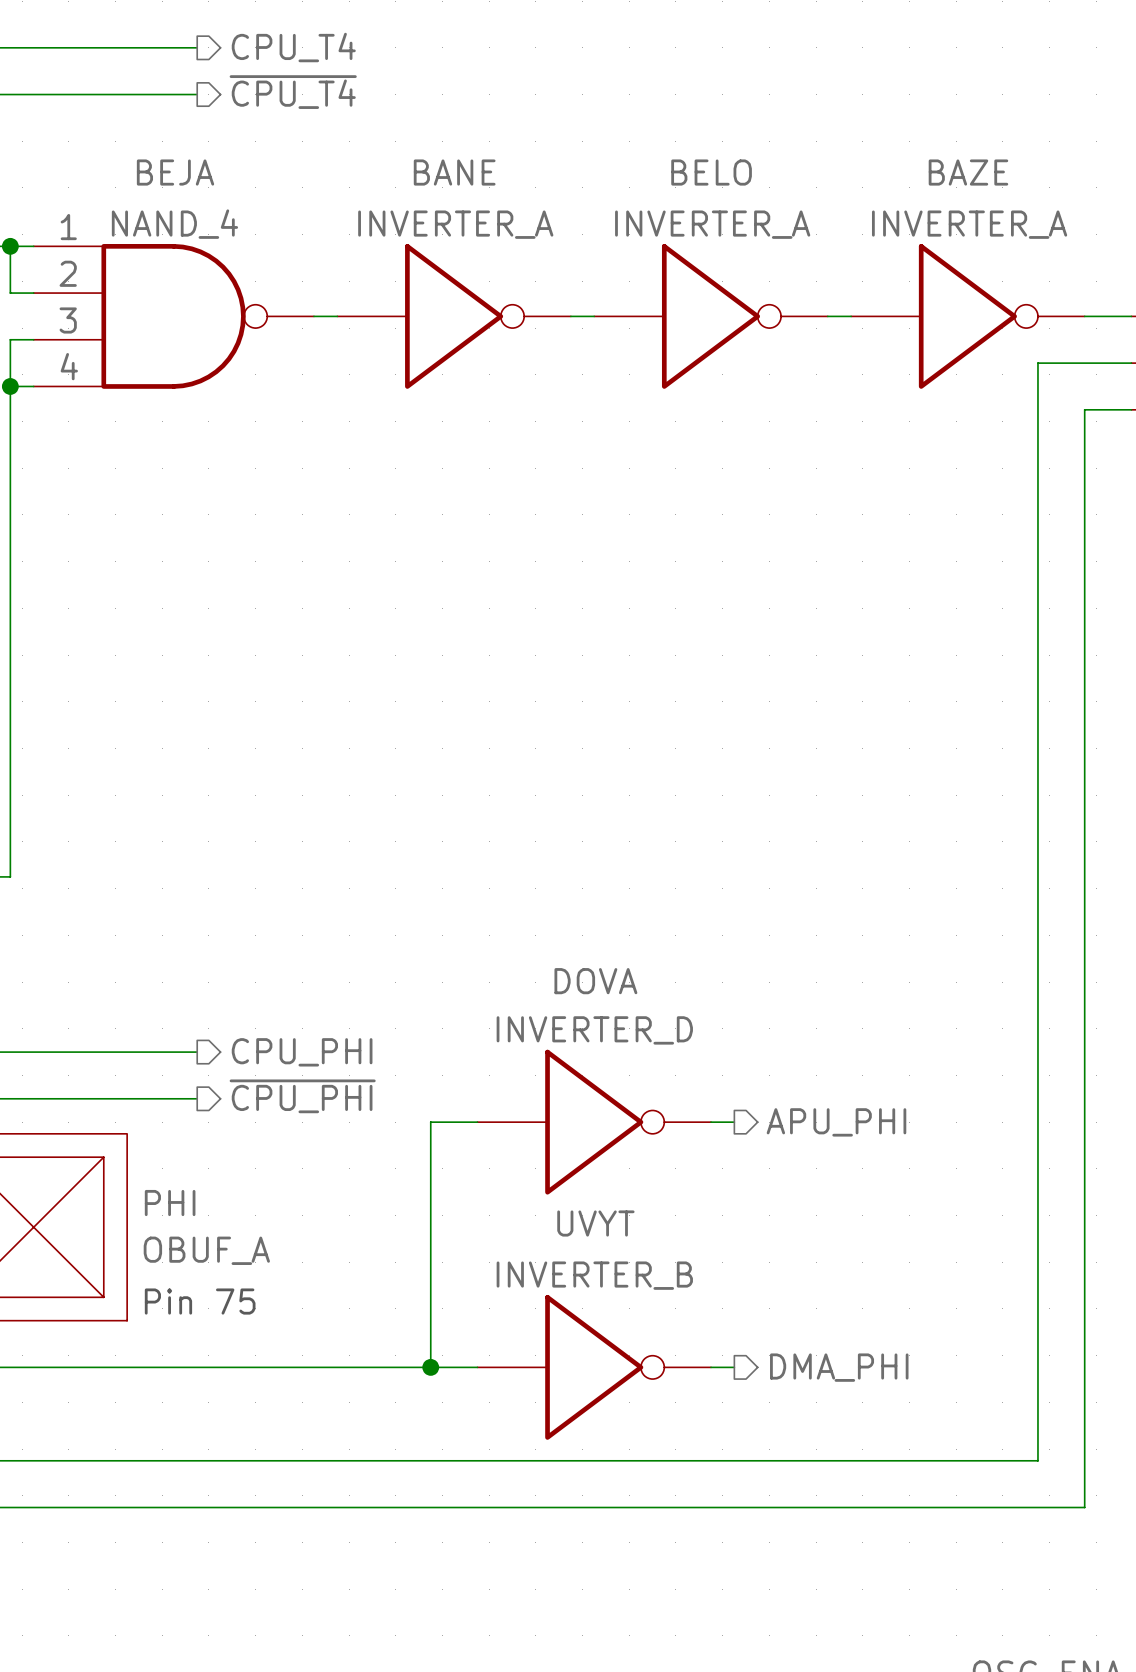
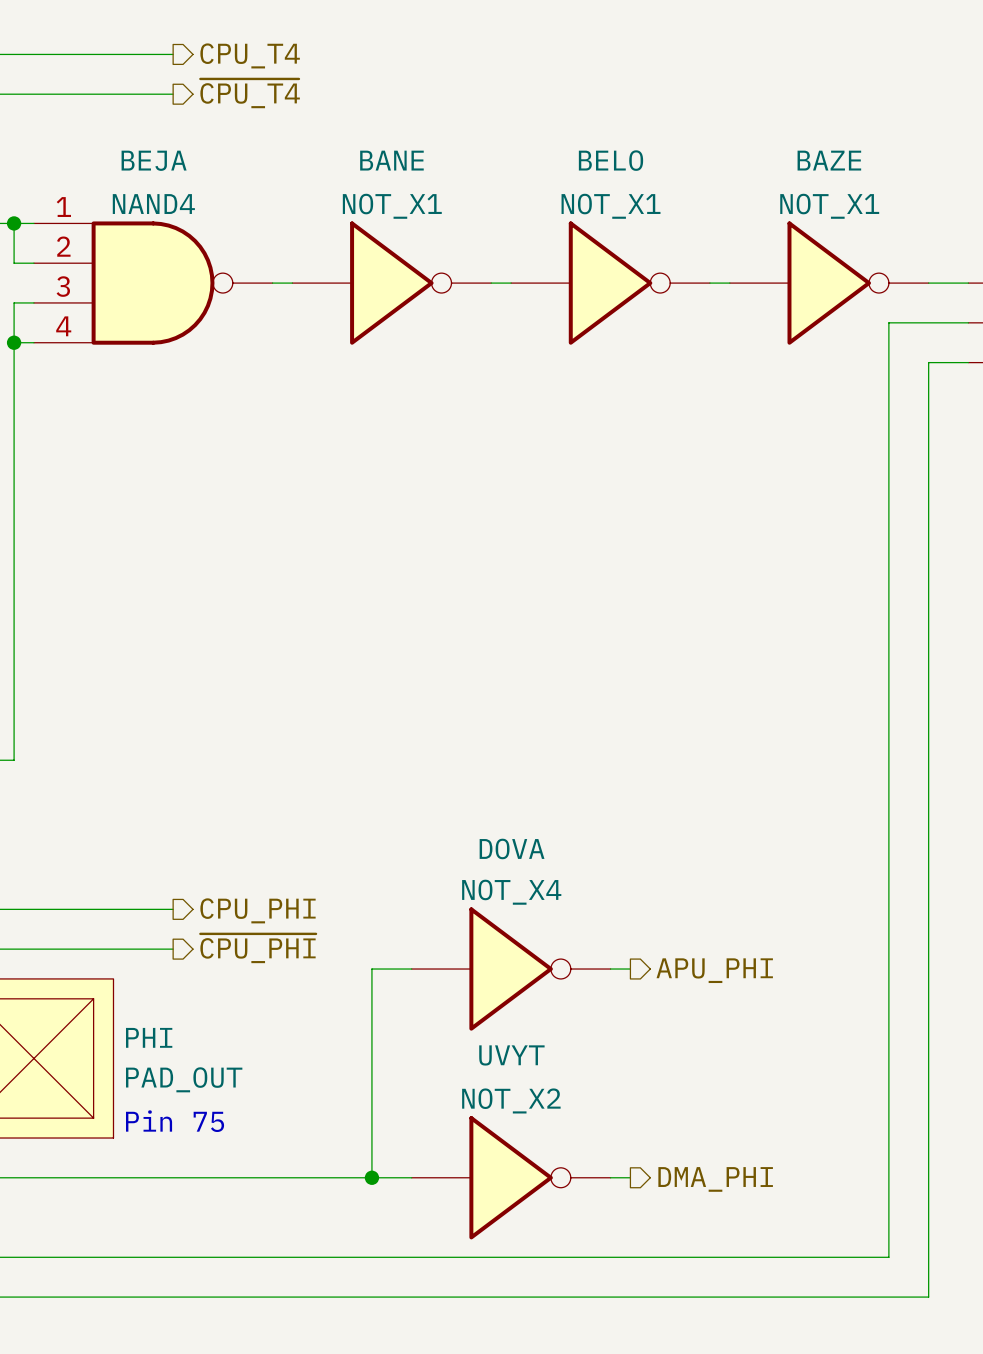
BEJA value: NAND_4 (174, 224) -> NAND4 (153, 204)
BANE value: INVERTER_A (455, 224) -> NOT_X1 (392, 206)
BELO value: INVERTER_A (712, 224) -> NOT_X1 (611, 206)
BAZE value: INVERTER_A (969, 224) -> NOT_X1 (829, 206)
DOVA value: INVERTER_D (594, 1030) -> NOT_X4 (511, 892)
PHI value: OBUF_A (206, 1250) -> PAD_OUT (184, 1079)
UVYT value: INVERTER_B (594, 1275) -> NOT_X2 (511, 1100)

